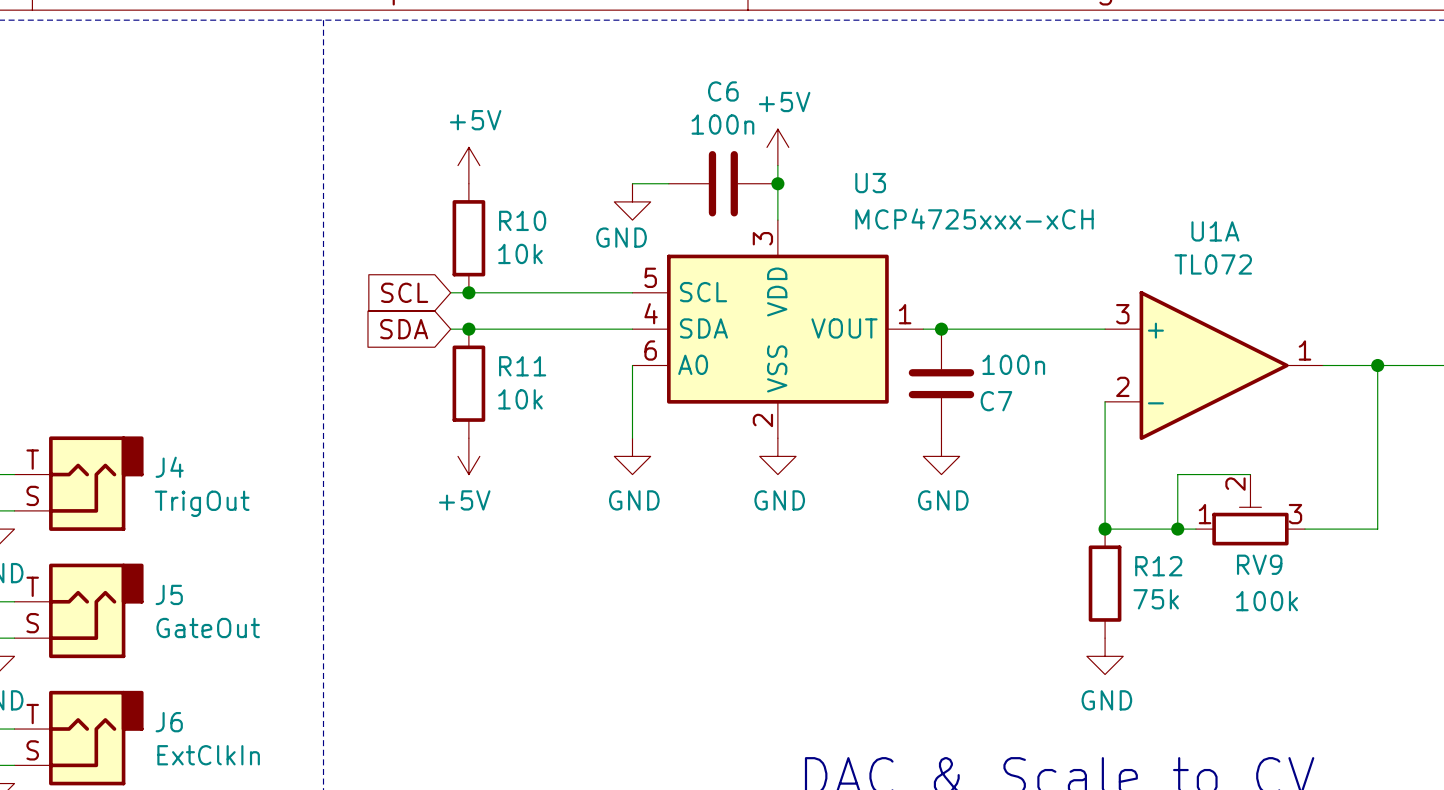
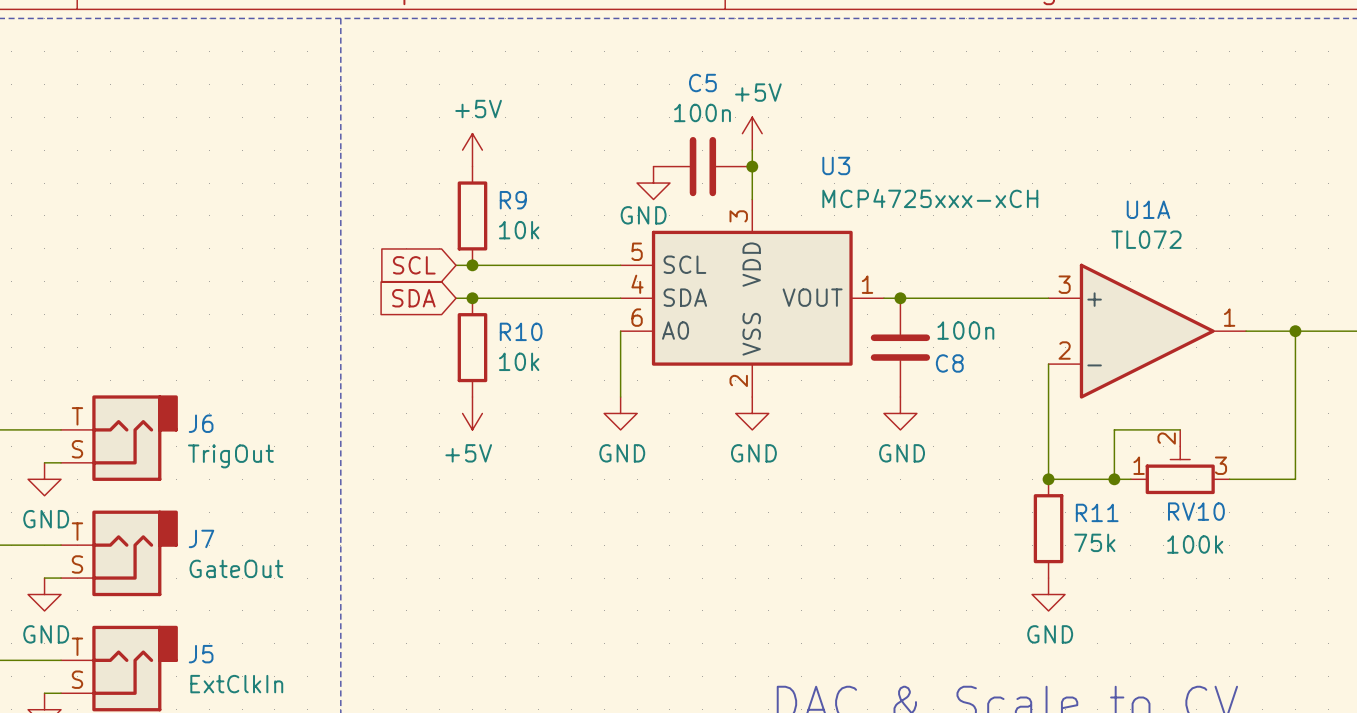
C6 name: C6 (723, 91) -> C5 (702, 83)
wire: (632, 183) (668, 183) -> none
power symbol position: GND (632, 201) -> GND (653, 183)
R10 name: R10 (522, 220) -> R9 (513, 200)
R11 name: R11 (522, 366) -> R10 (521, 331)
C7 name: C7 (996, 401) -> C8 (949, 363)
J4 name: J4 (169, 467) -> J6 (201, 423)
RV9 name: RV9 (1259, 564) -> RV10 (1196, 511)
R12 name: R12 (1158, 566) -> R11 (1097, 512)
J5 name: J5 (169, 594) -> J7 (201, 538)
J6 name: J6 (169, 722) -> J5 (201, 654)

